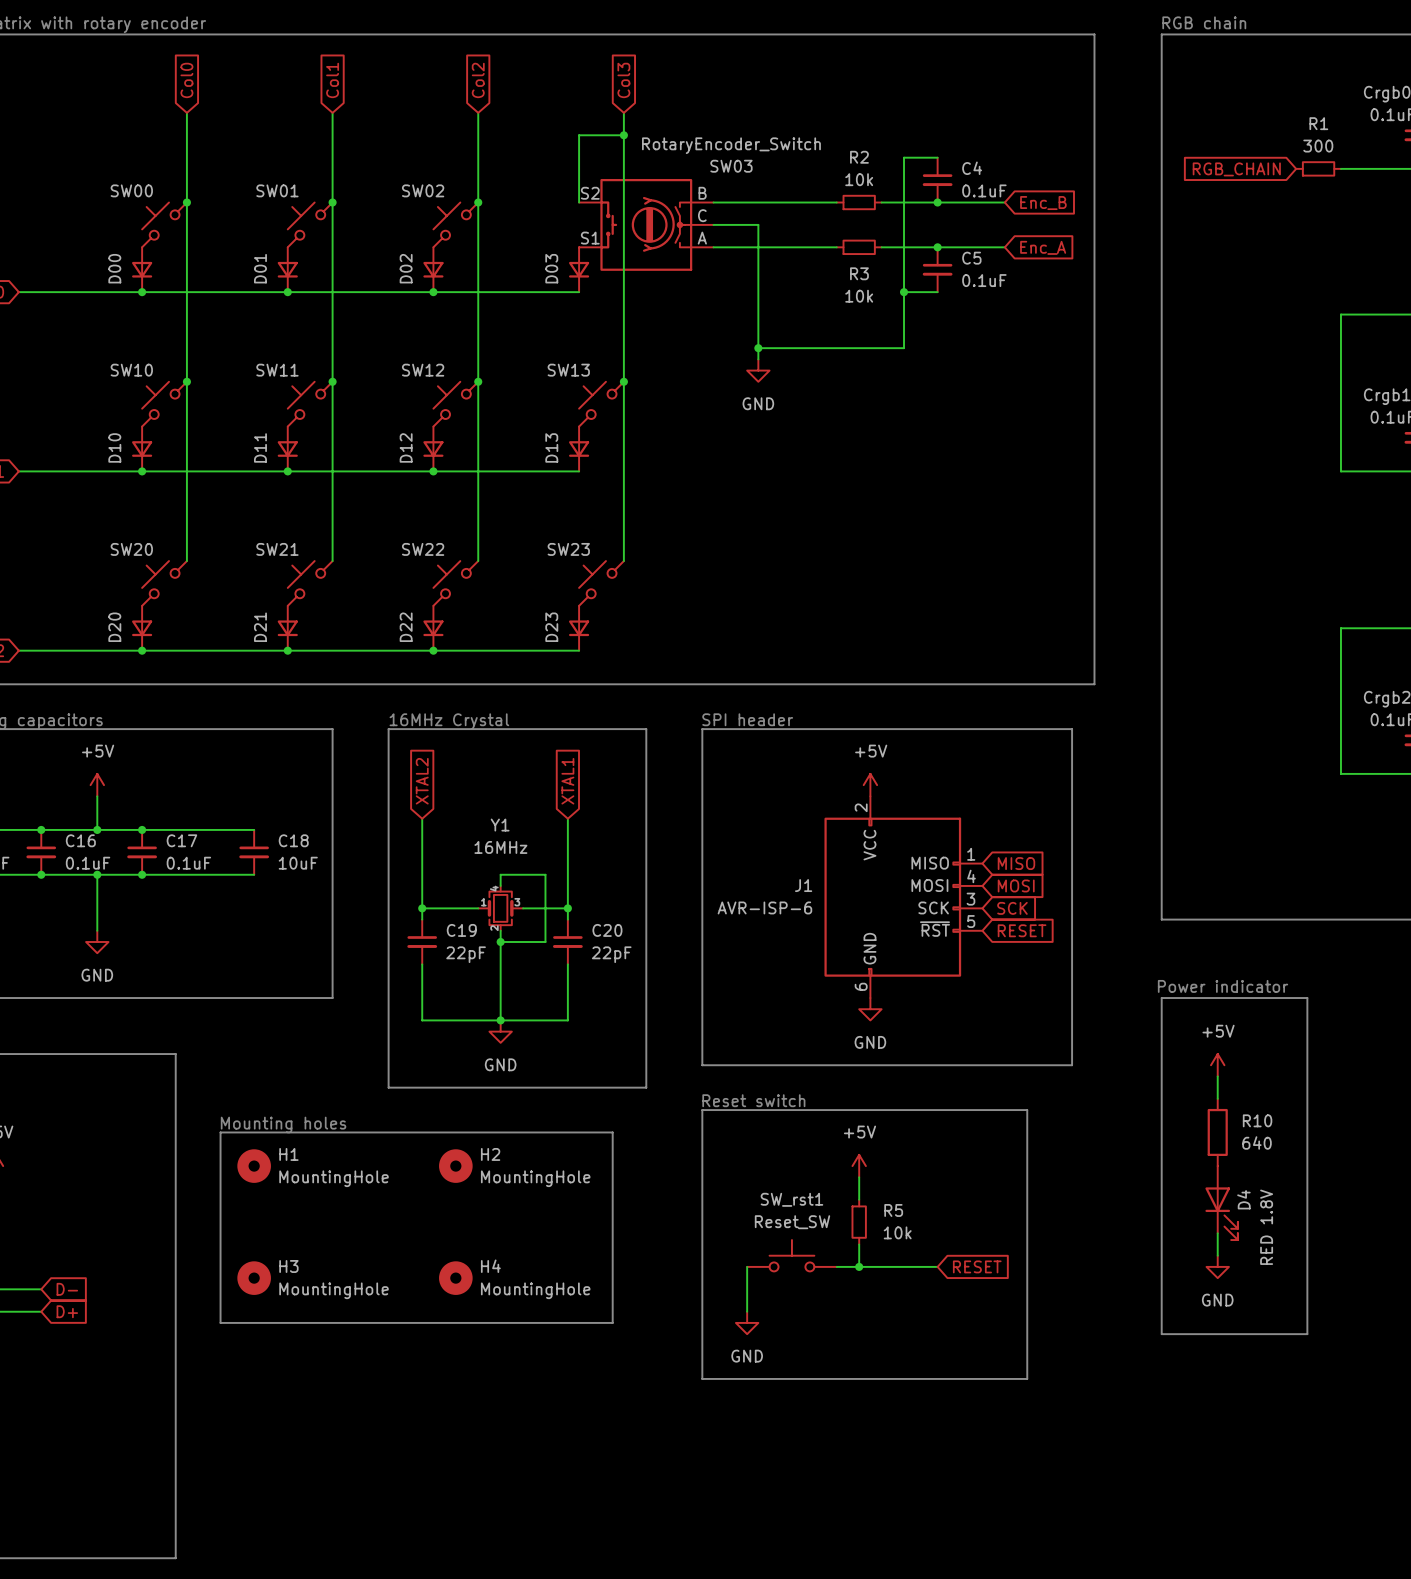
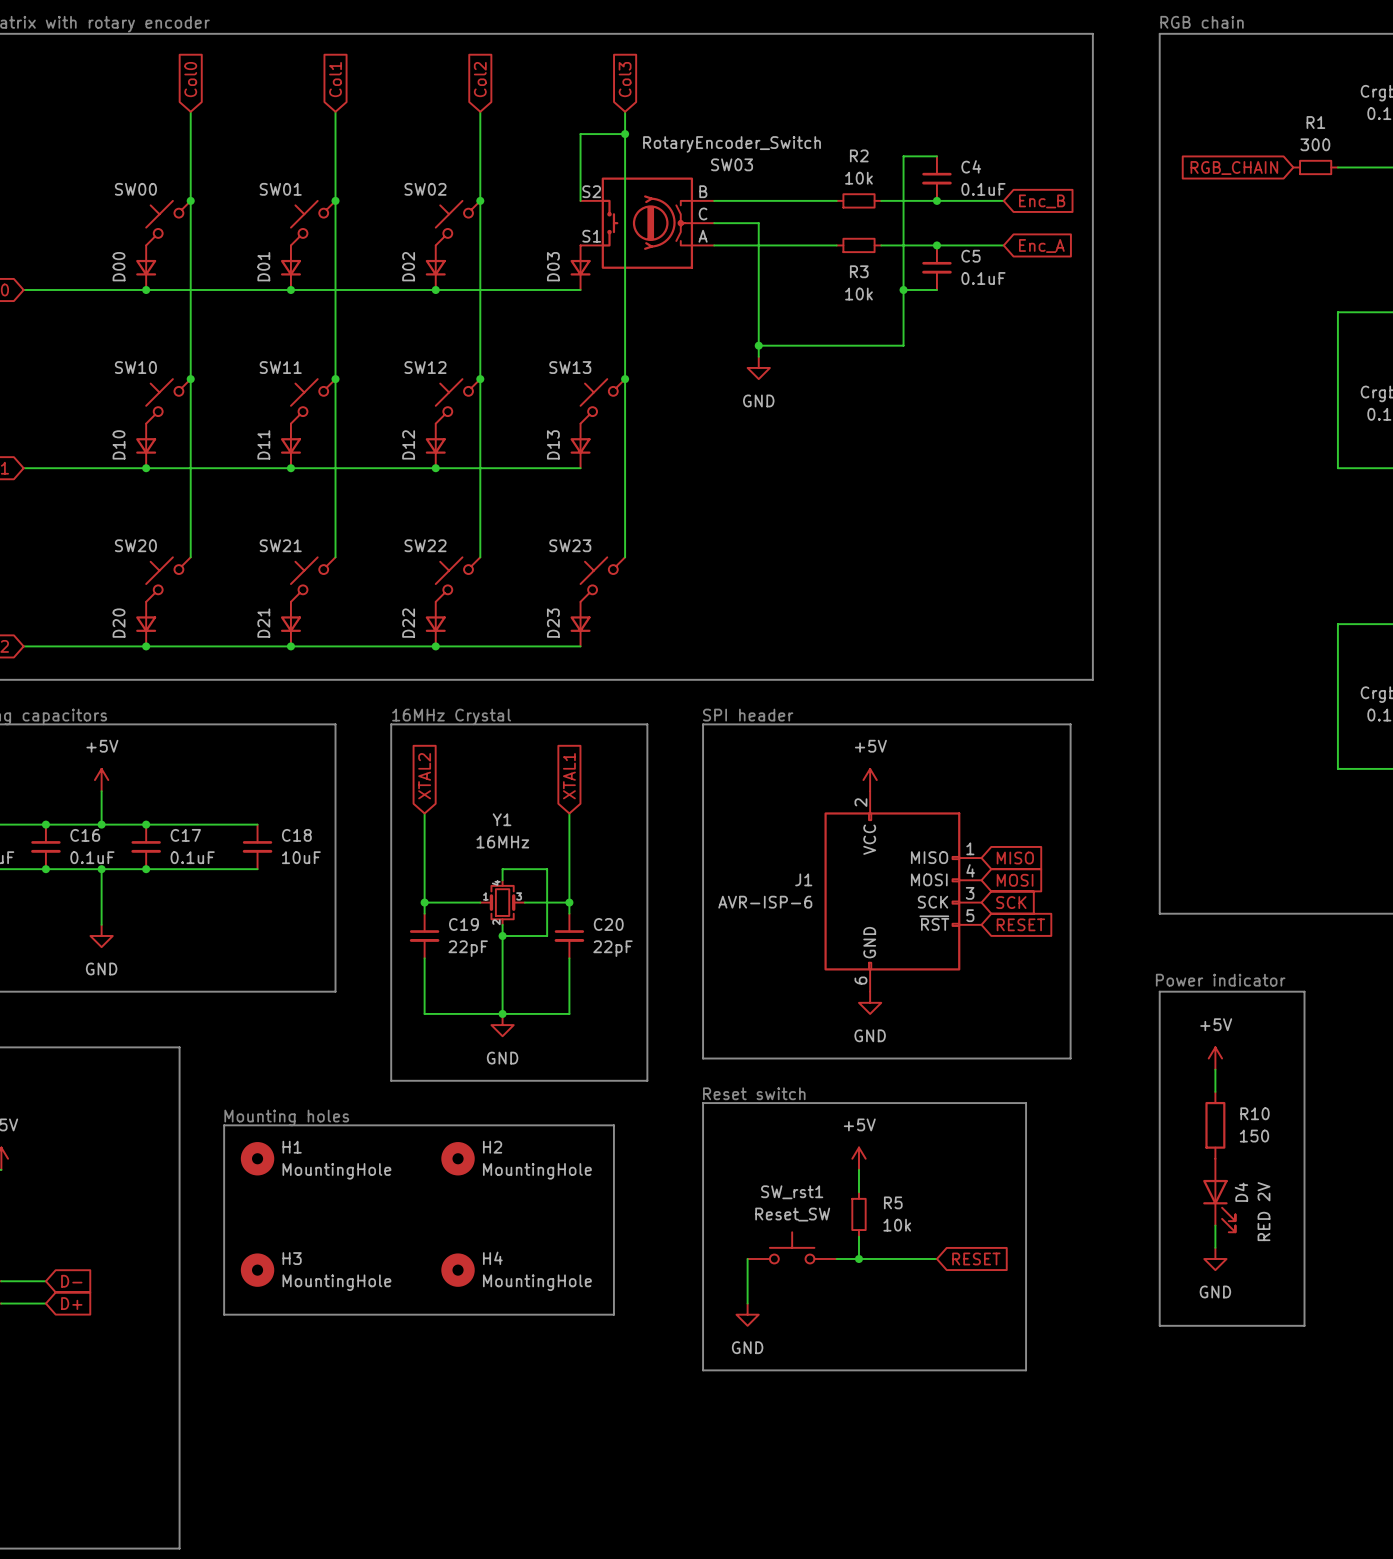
R10 value: 640 (1257, 1142) -> 150 (1254, 1136)
D4 value: RED 1.8V (1266, 1227) -> RED 2V (1263, 1211)

